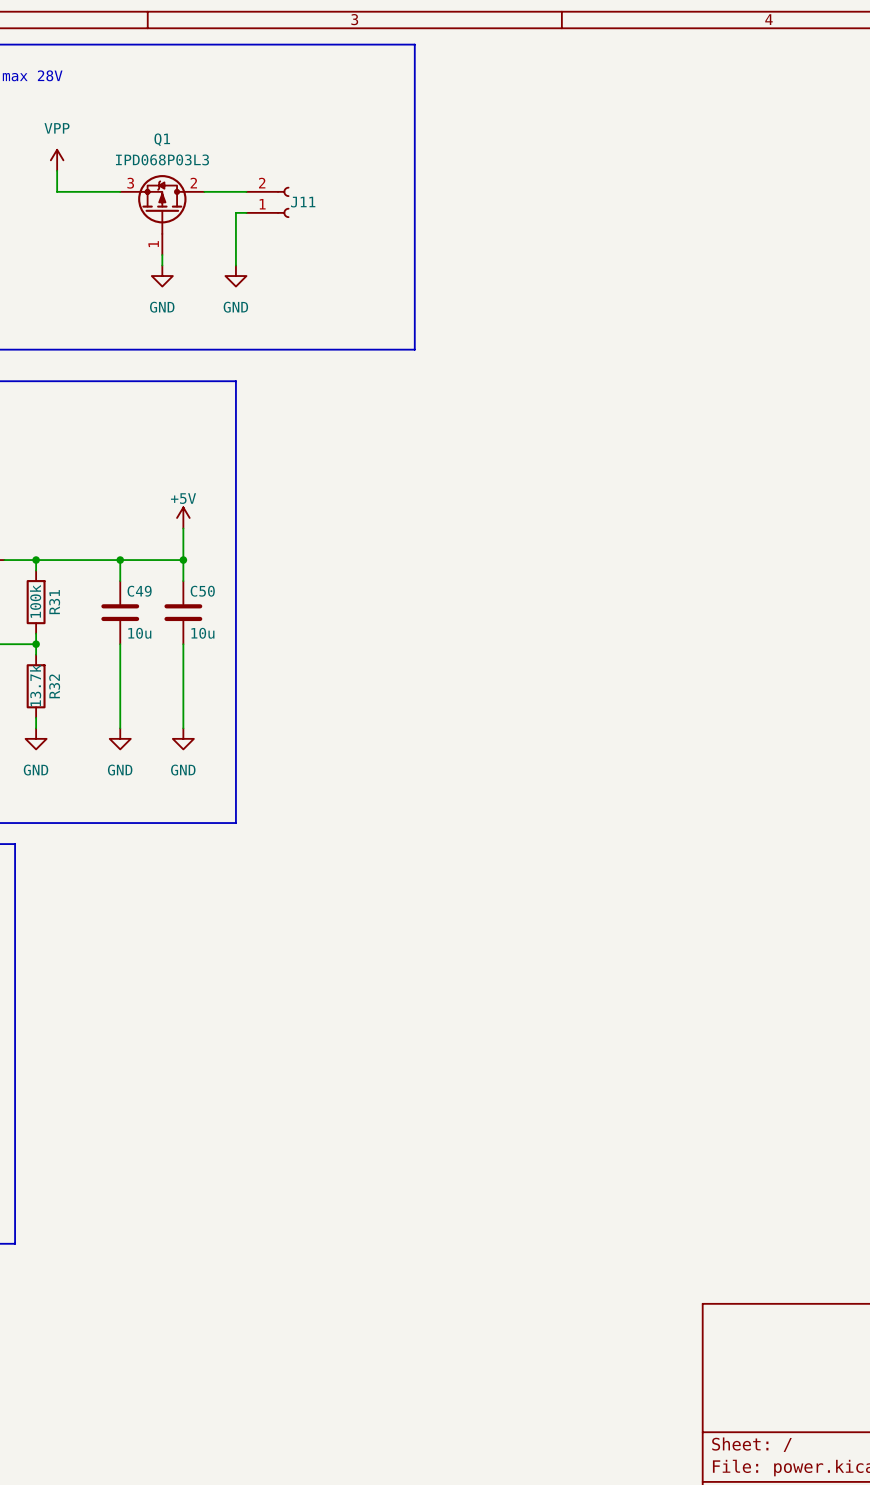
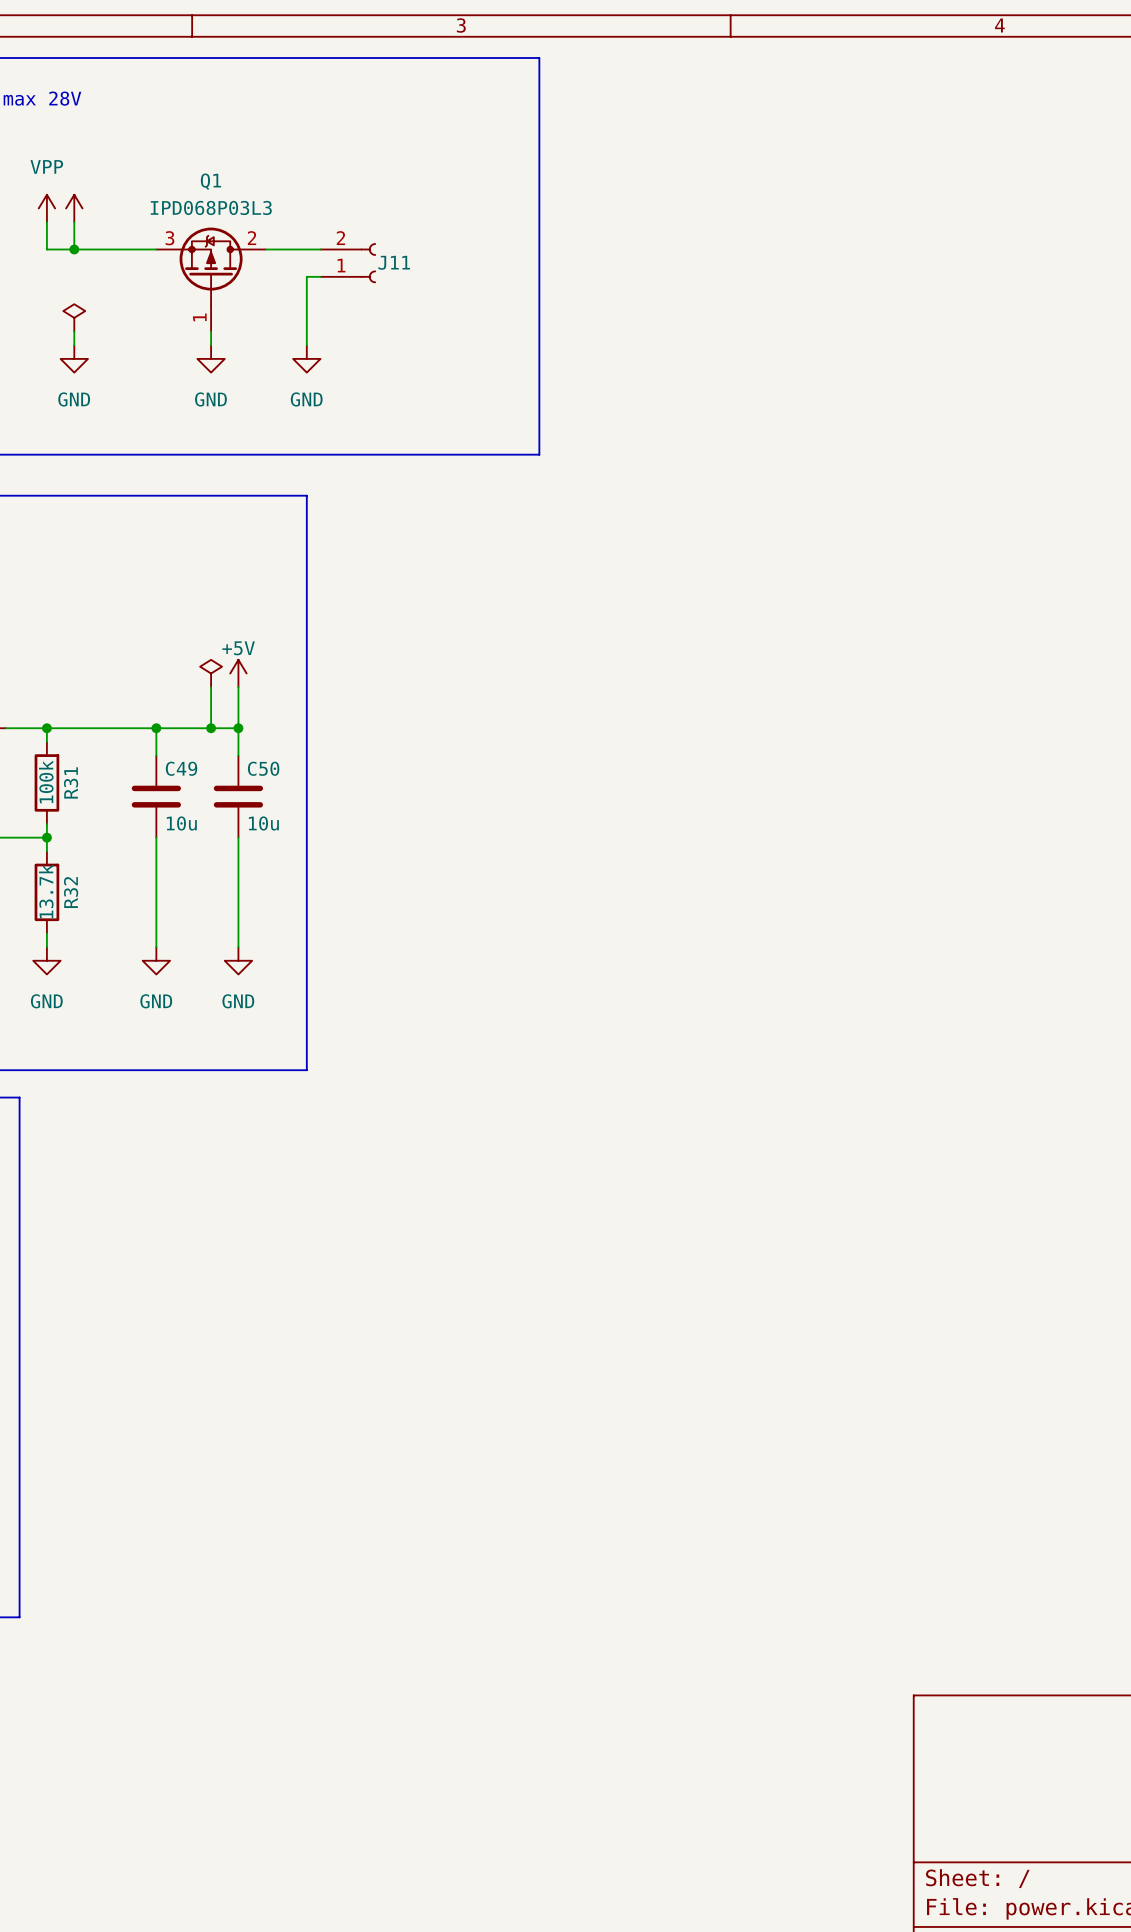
power symbol text: VPP (57, 128) -> none
power symbol: none -> VPP (46, 208)
wire: none -> (46, 222) (46, 249) (74, 249)
junction: none -> (74, 249)
power symbol: none -> (74, 317)
wire: none -> (74, 331) (74, 345)
power symbol: none -> GND (74, 358)
power symbol: none -> (211, 673)
wire: none -> (211, 687) (211, 728)
junction: none -> (211, 728)

